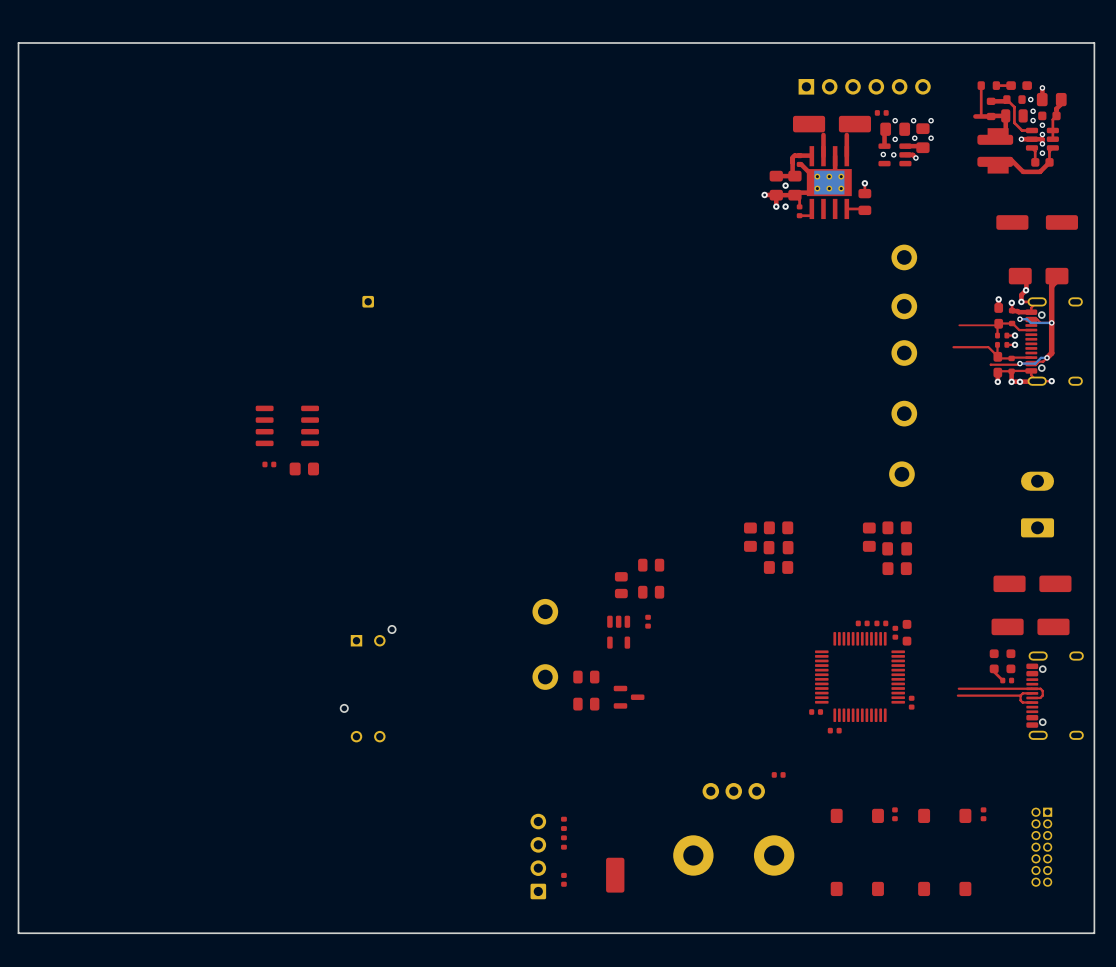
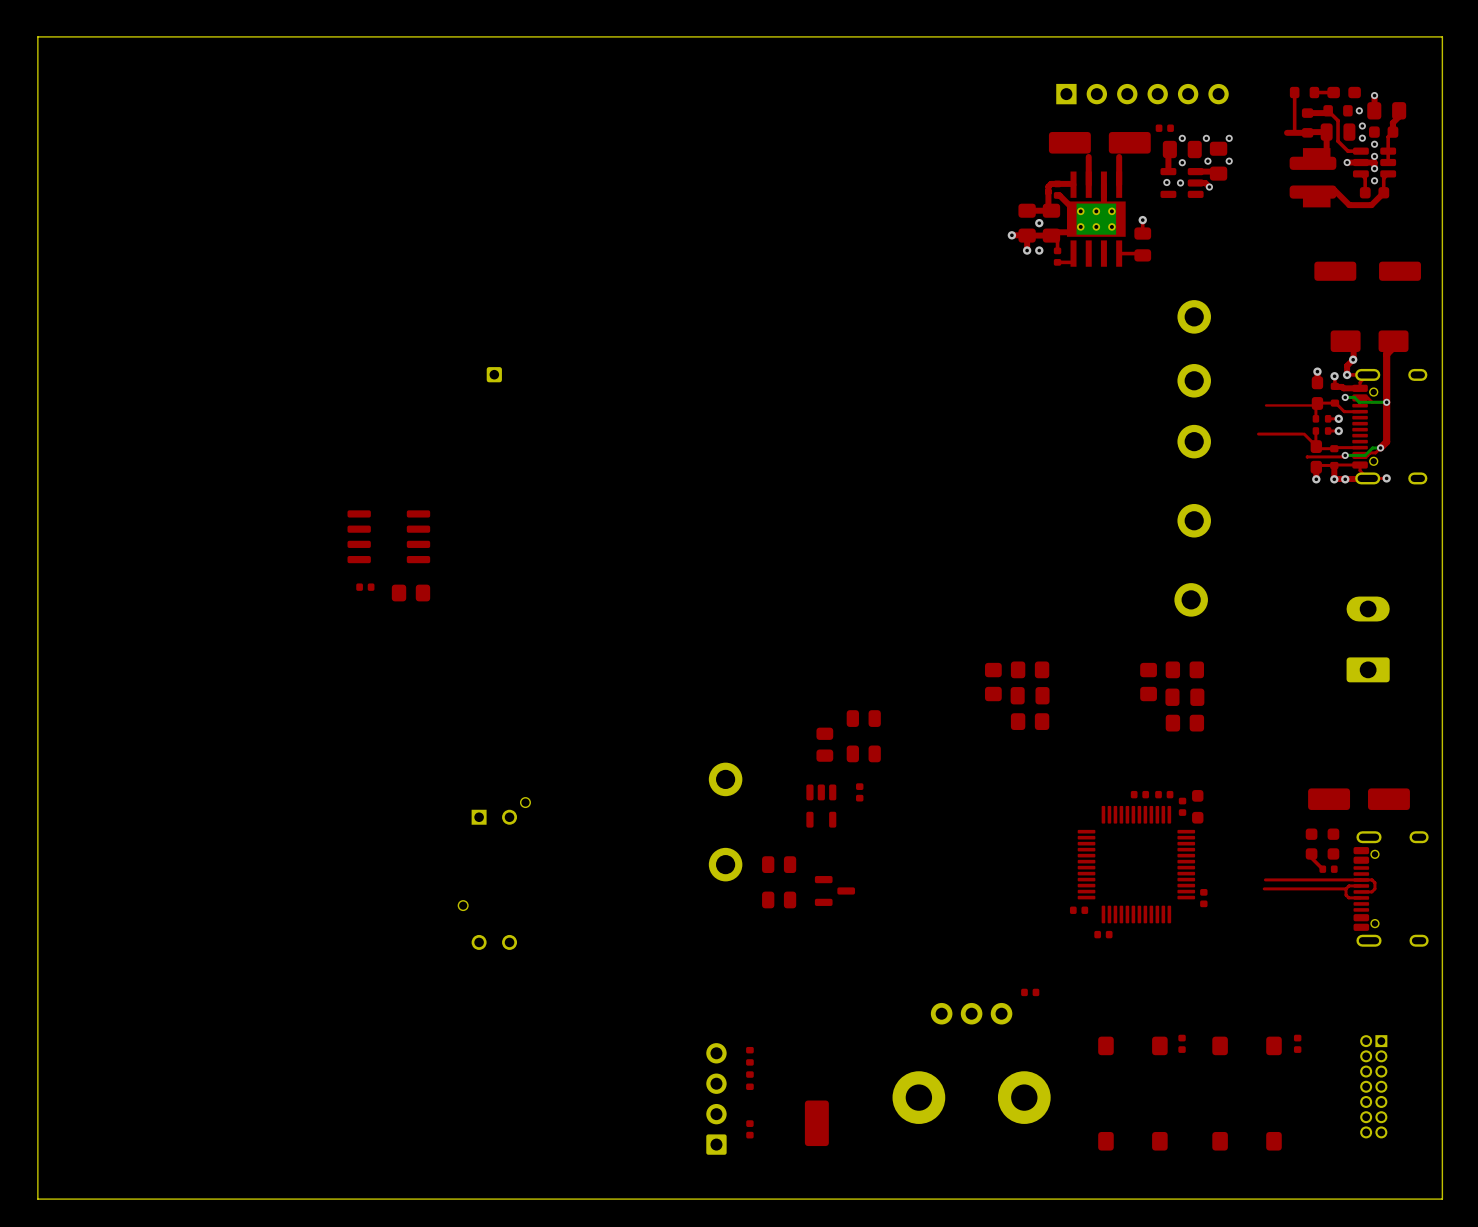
part: (1032, 583) -> none

